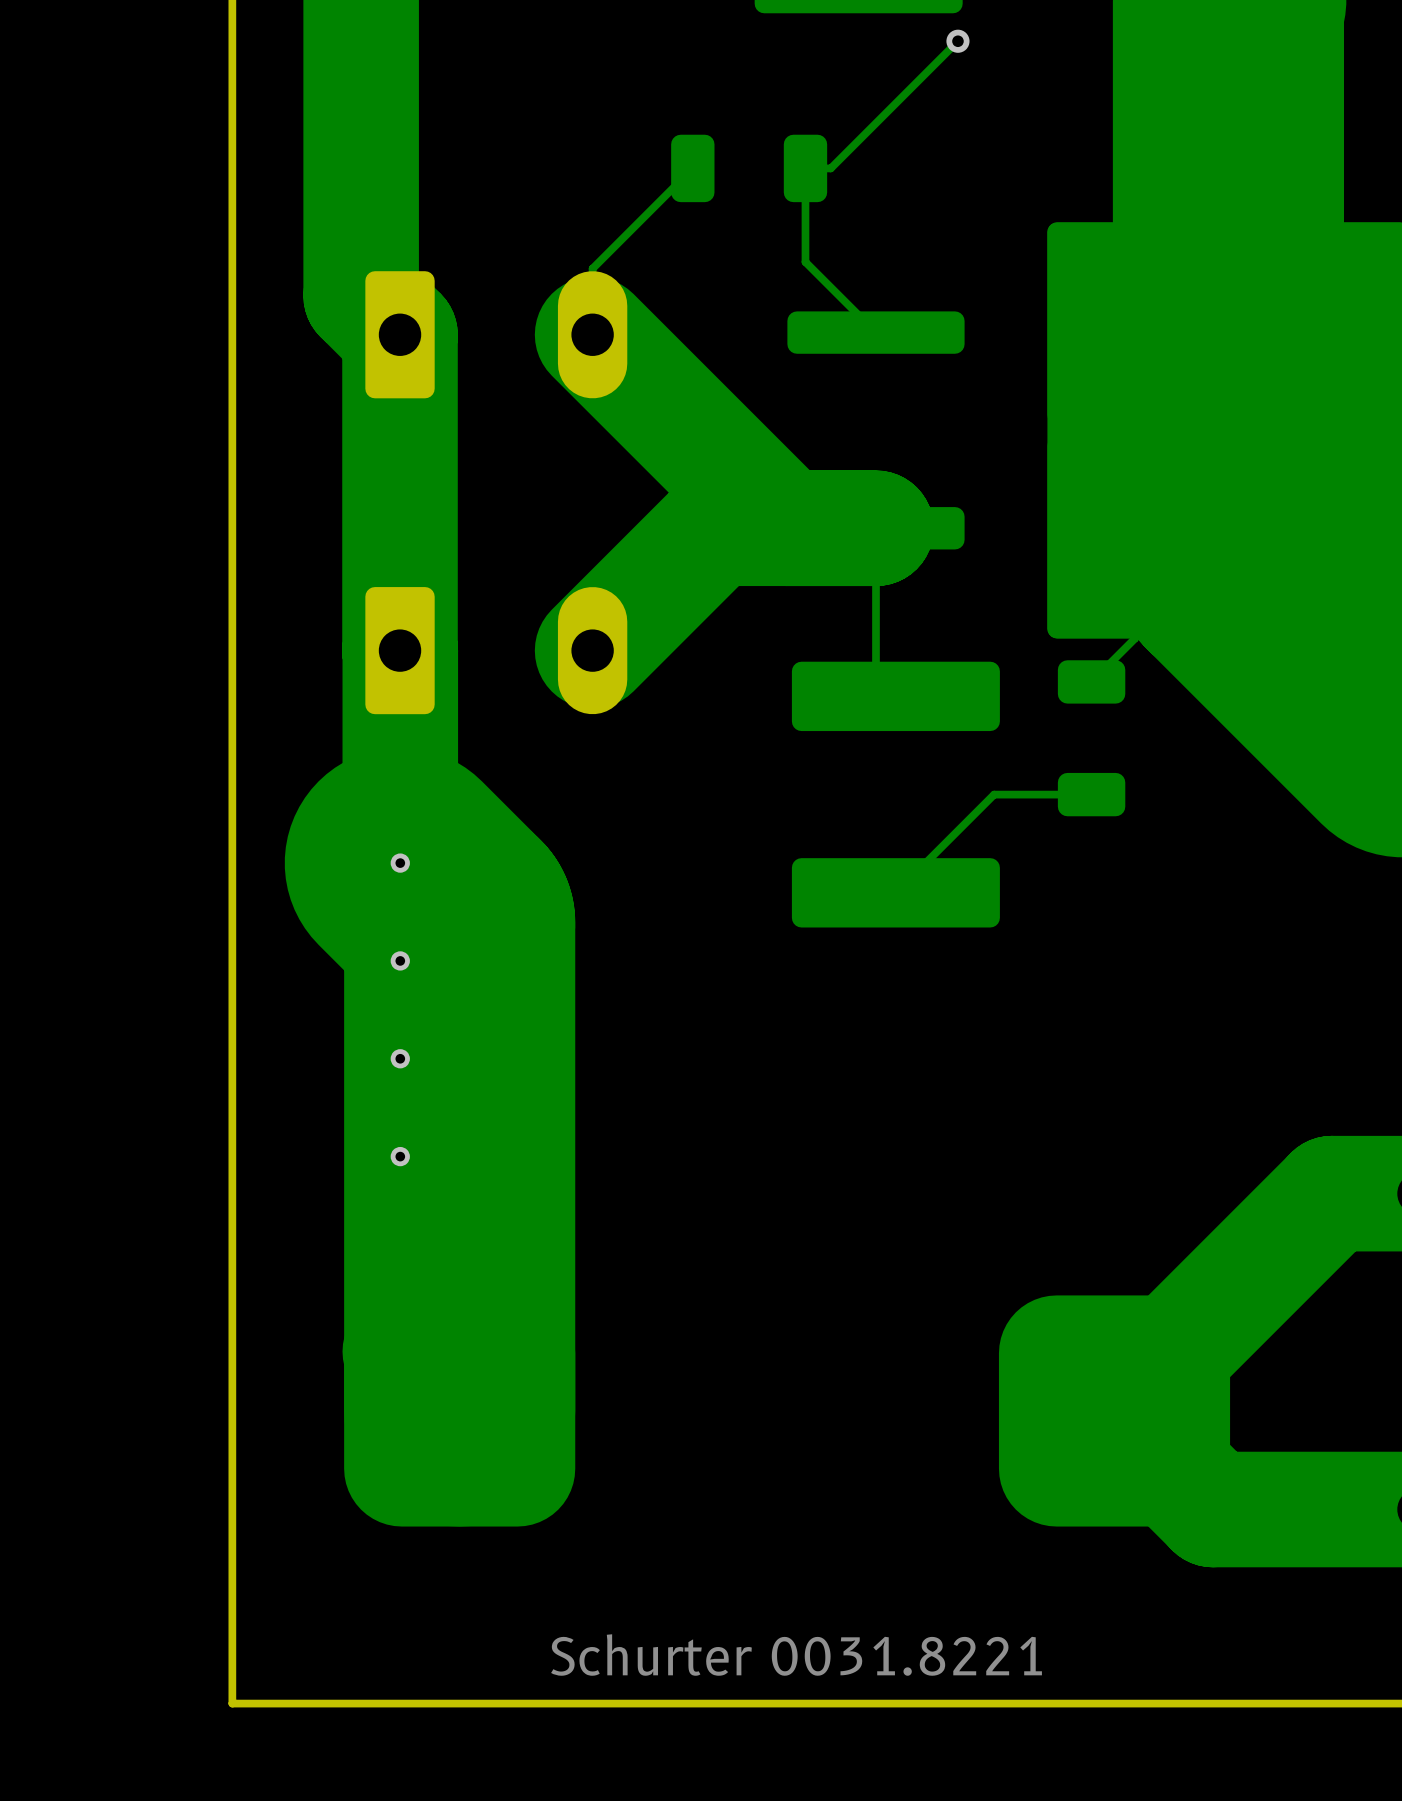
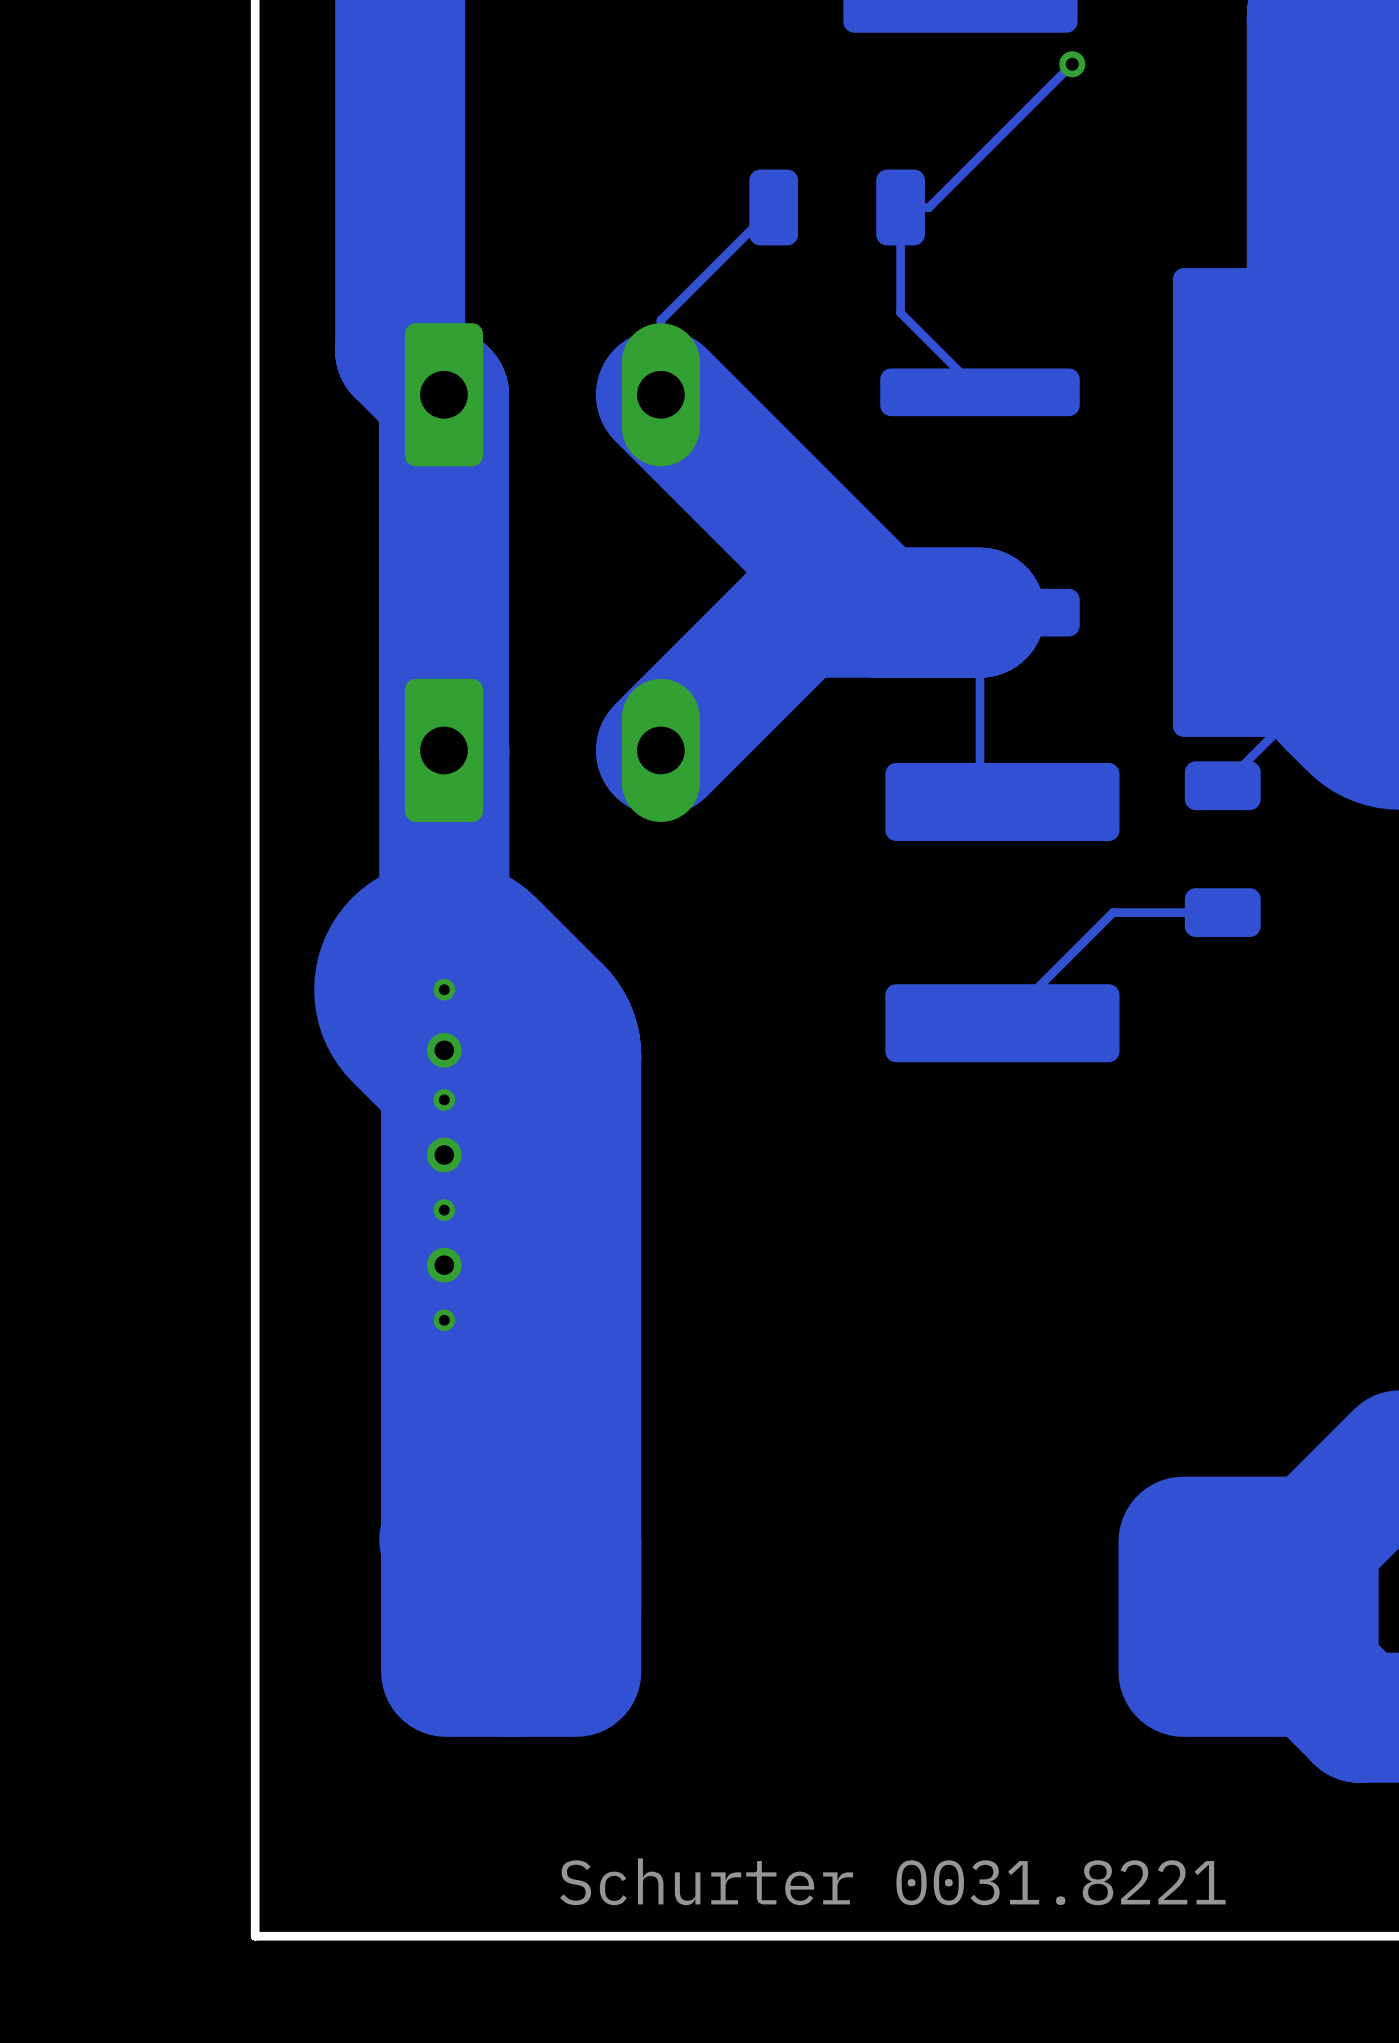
via: none -> (444, 1050)
via: none -> (444, 1155)
via: none -> (444, 1265)

